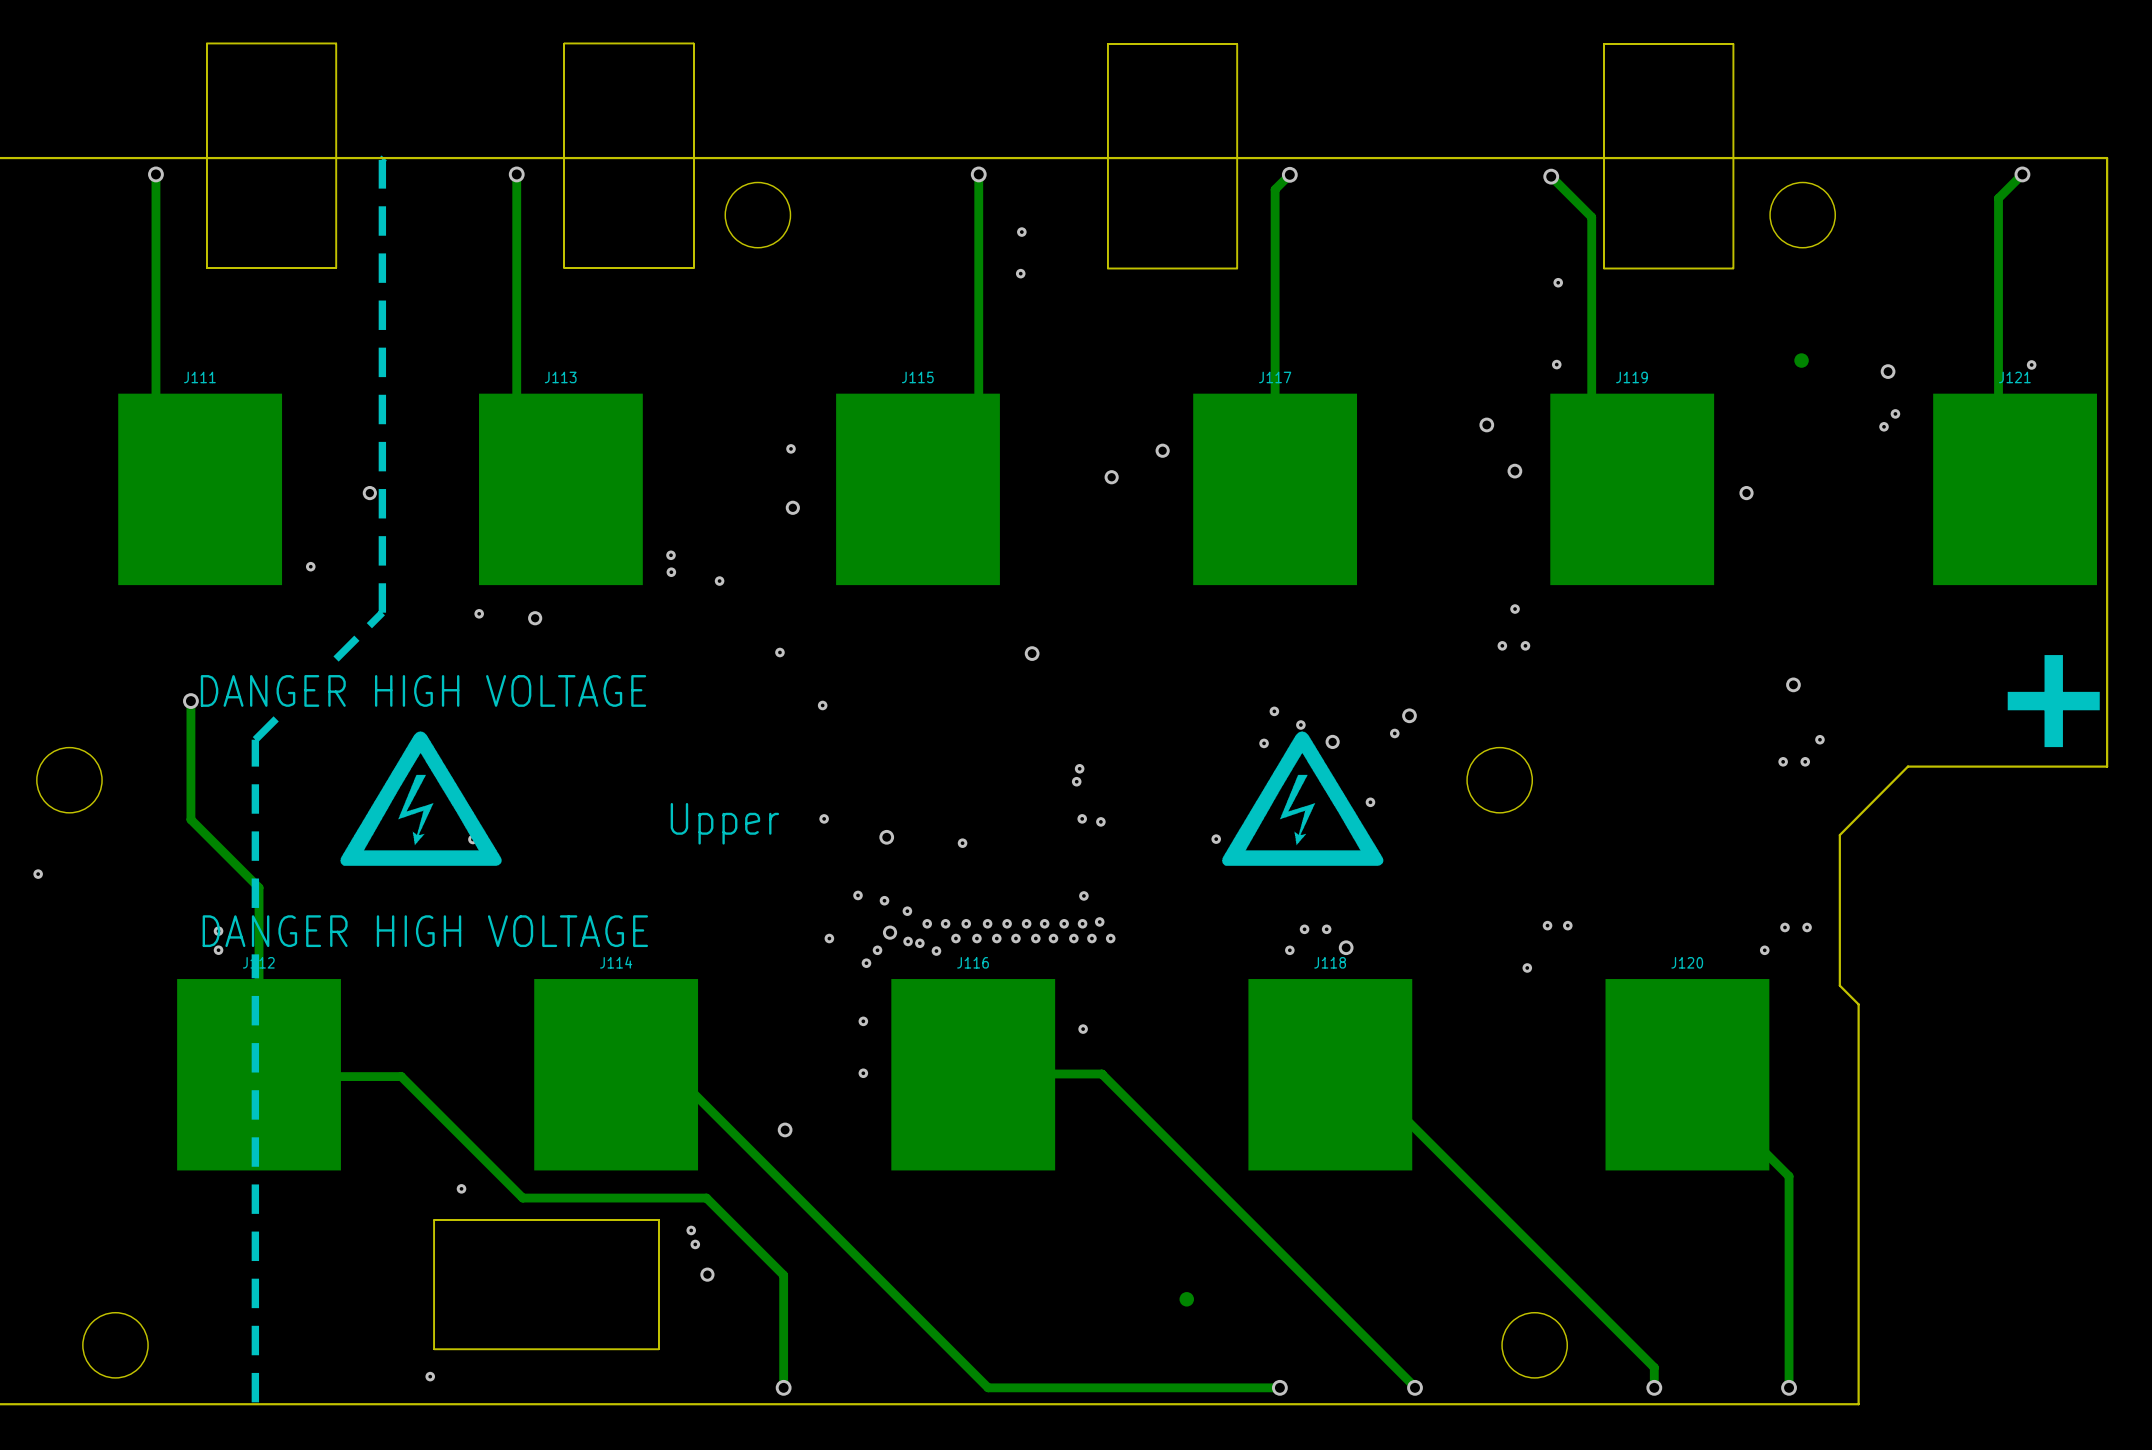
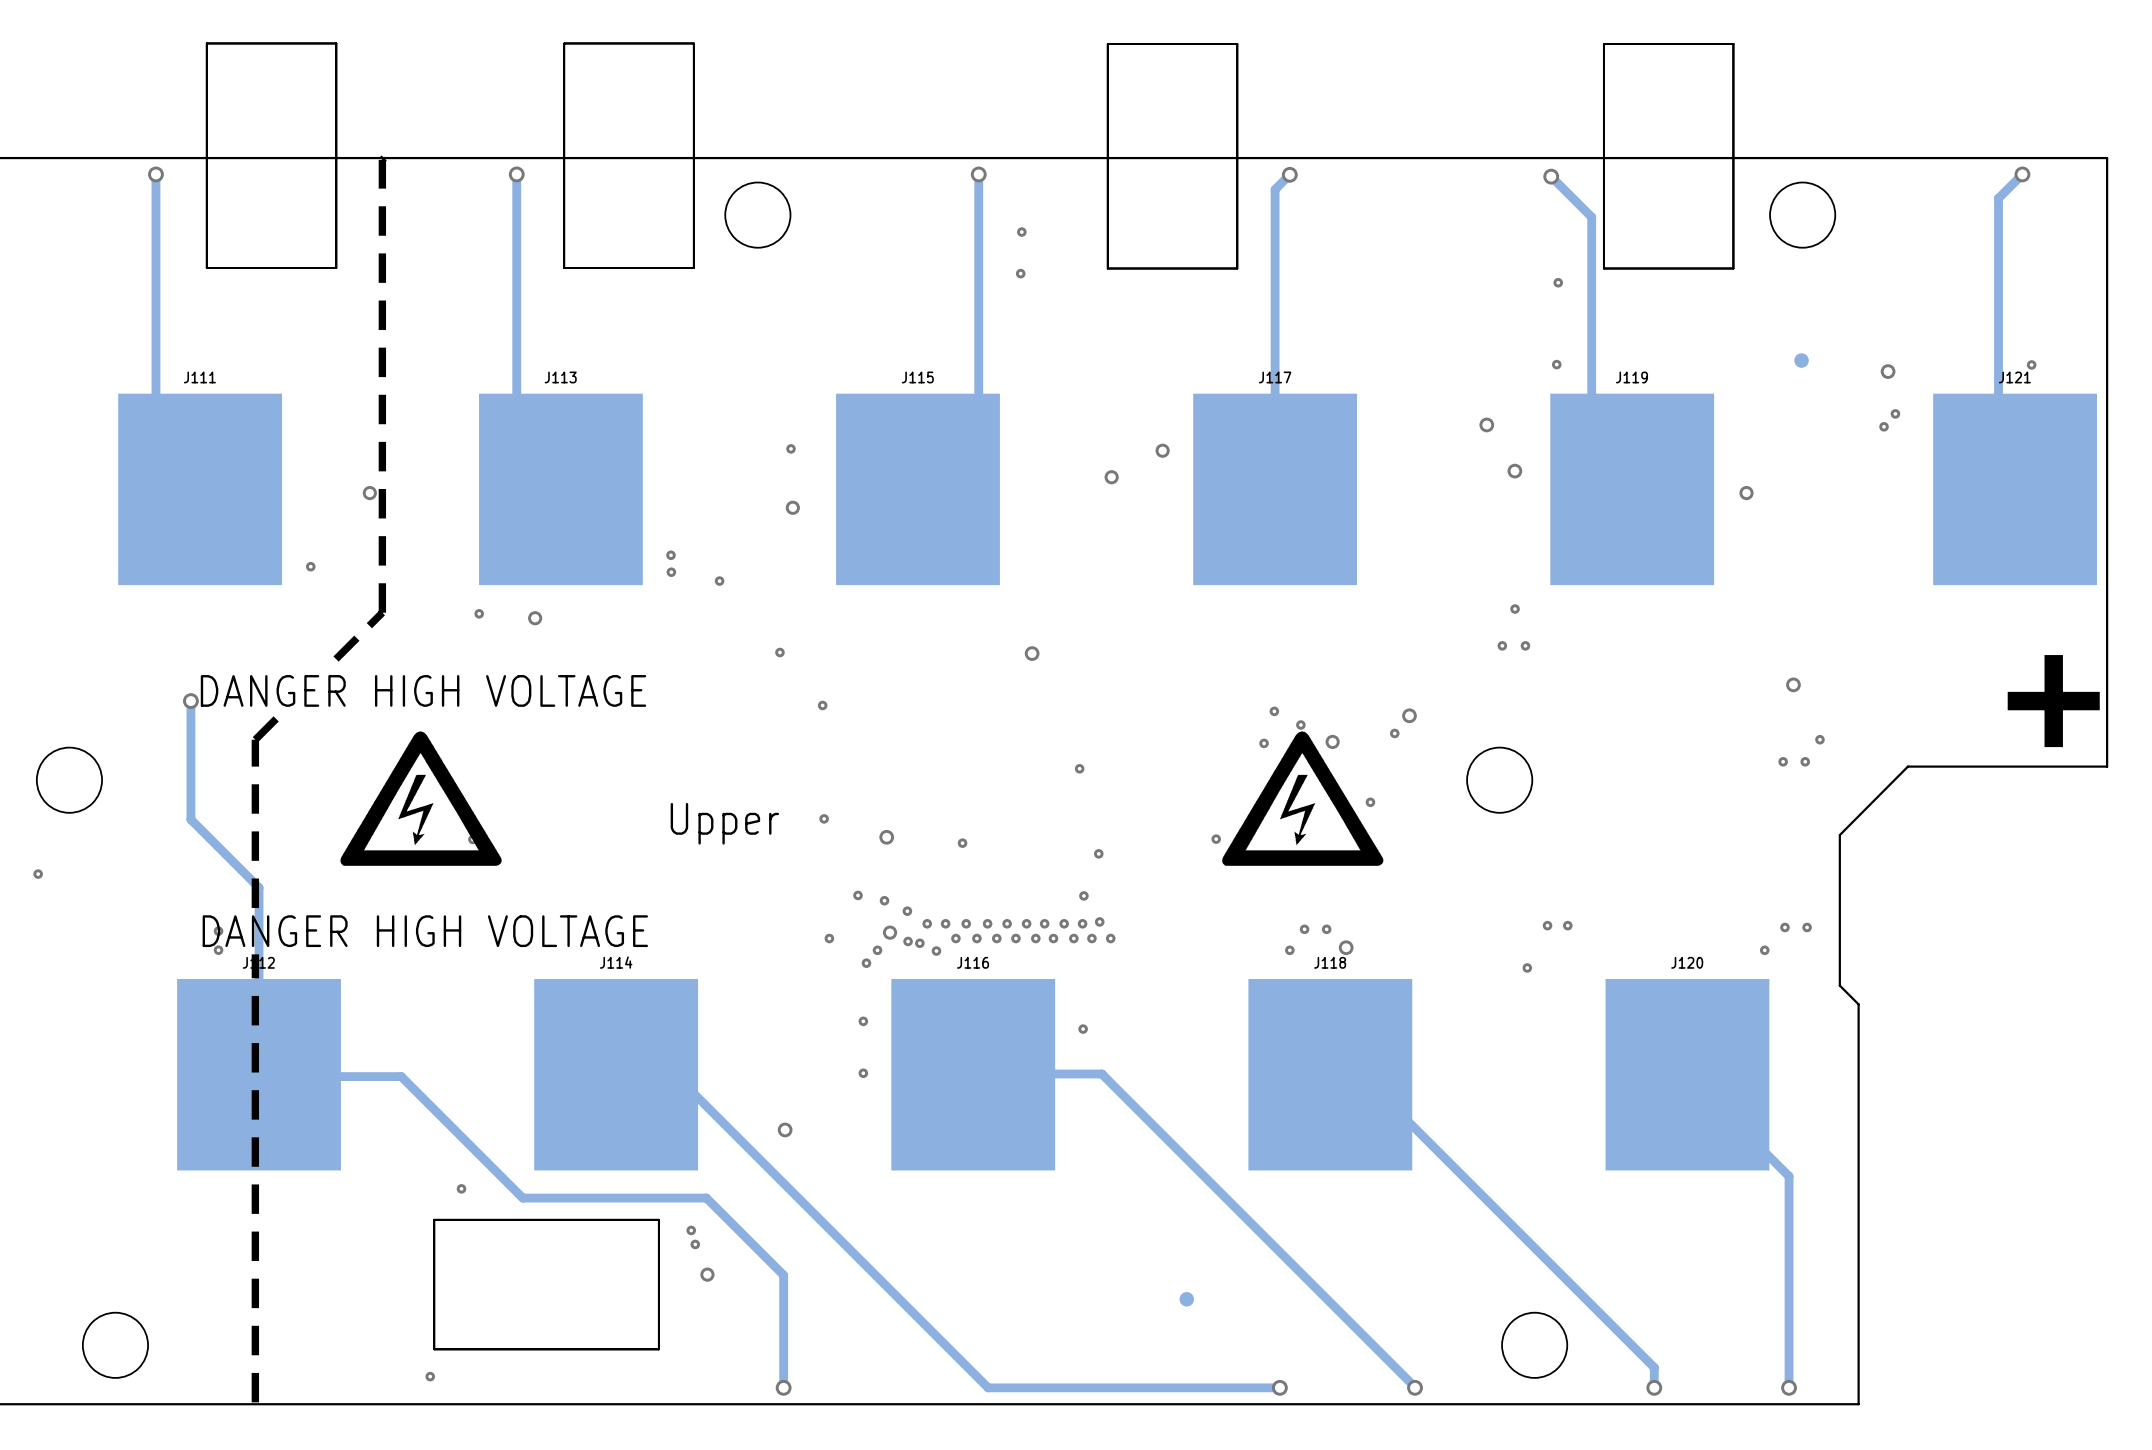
via: (1076, 781) -> none
via: (1082, 818) -> none
via: (1100, 821) -> none
via: none -> (1098, 853)

